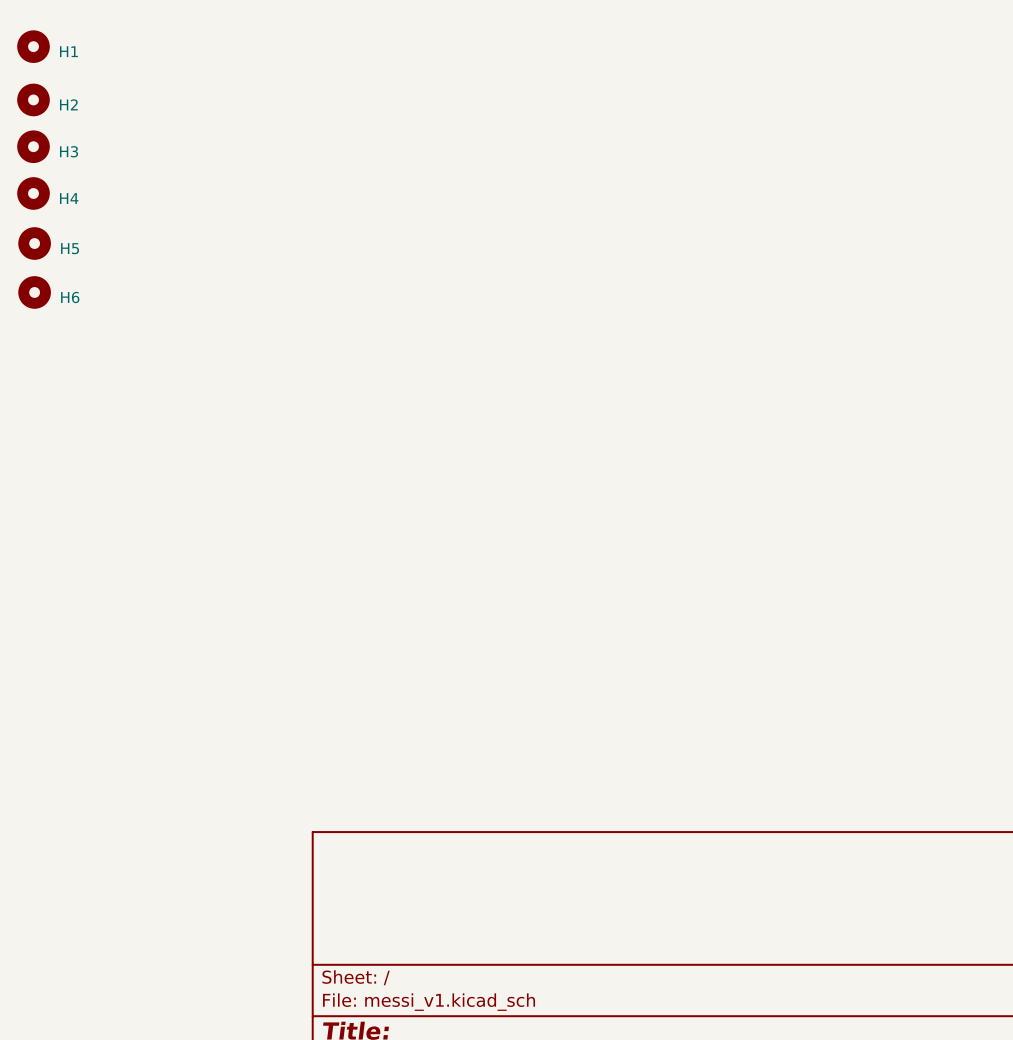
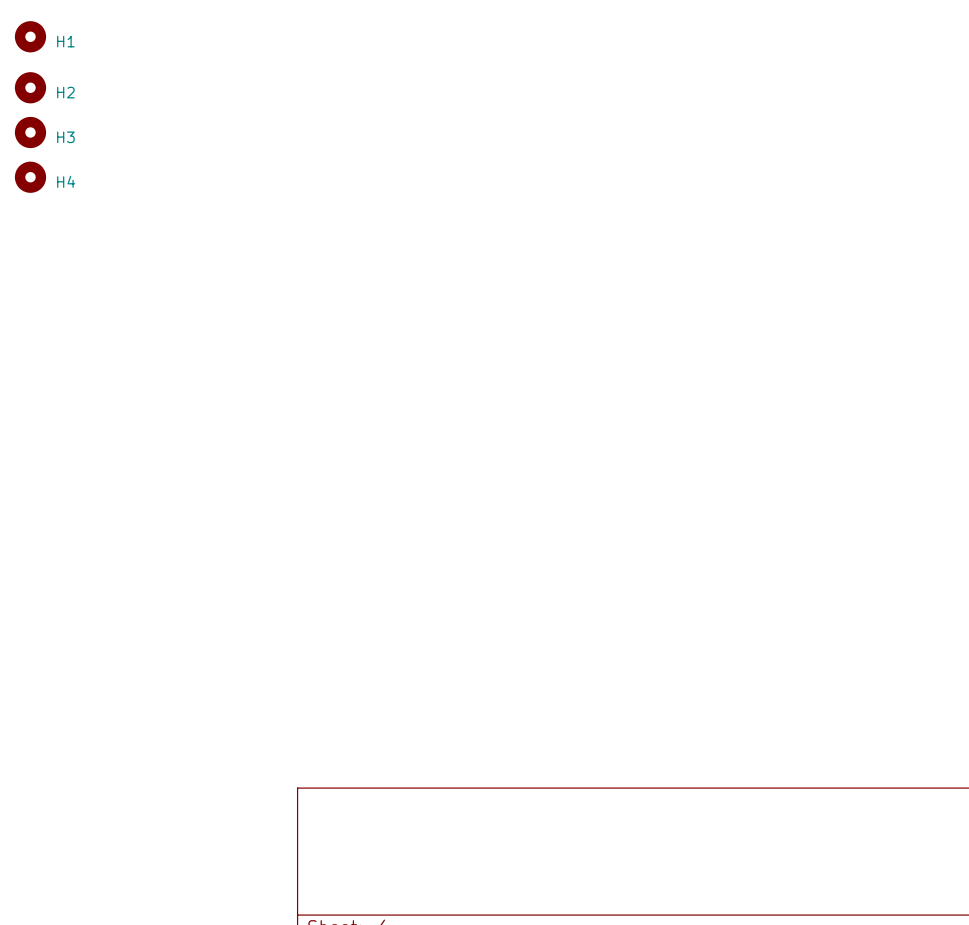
H5: (34, 243) -> none
H6: (34, 292) -> none

